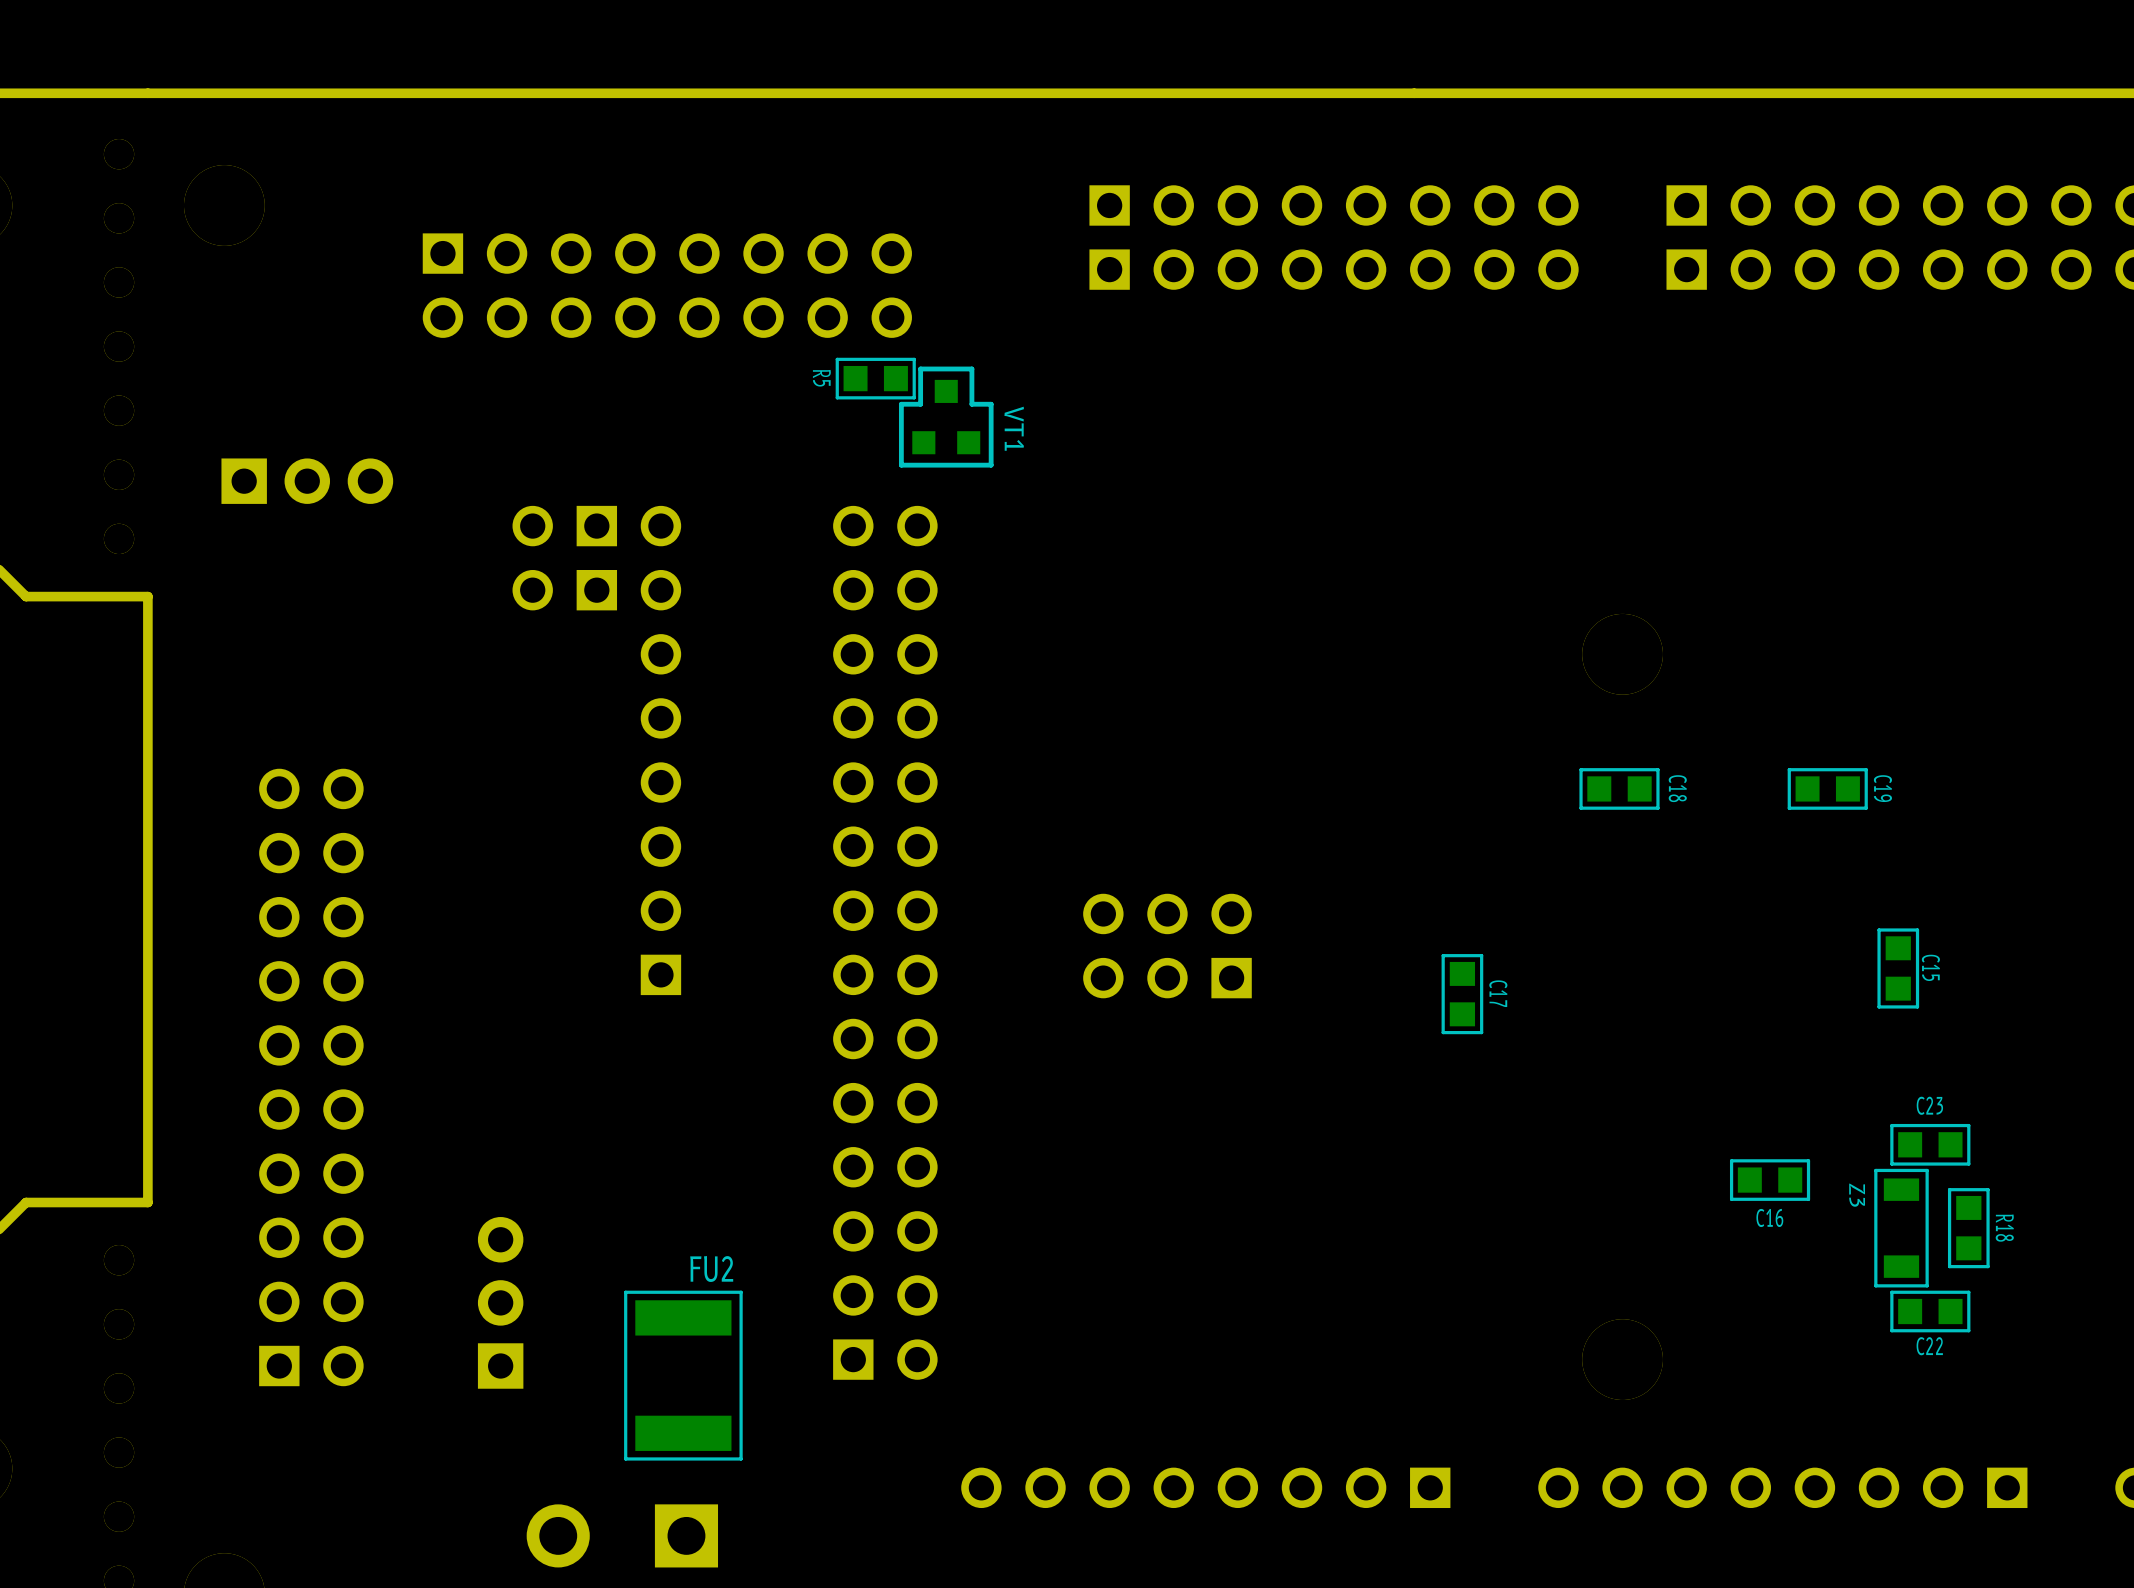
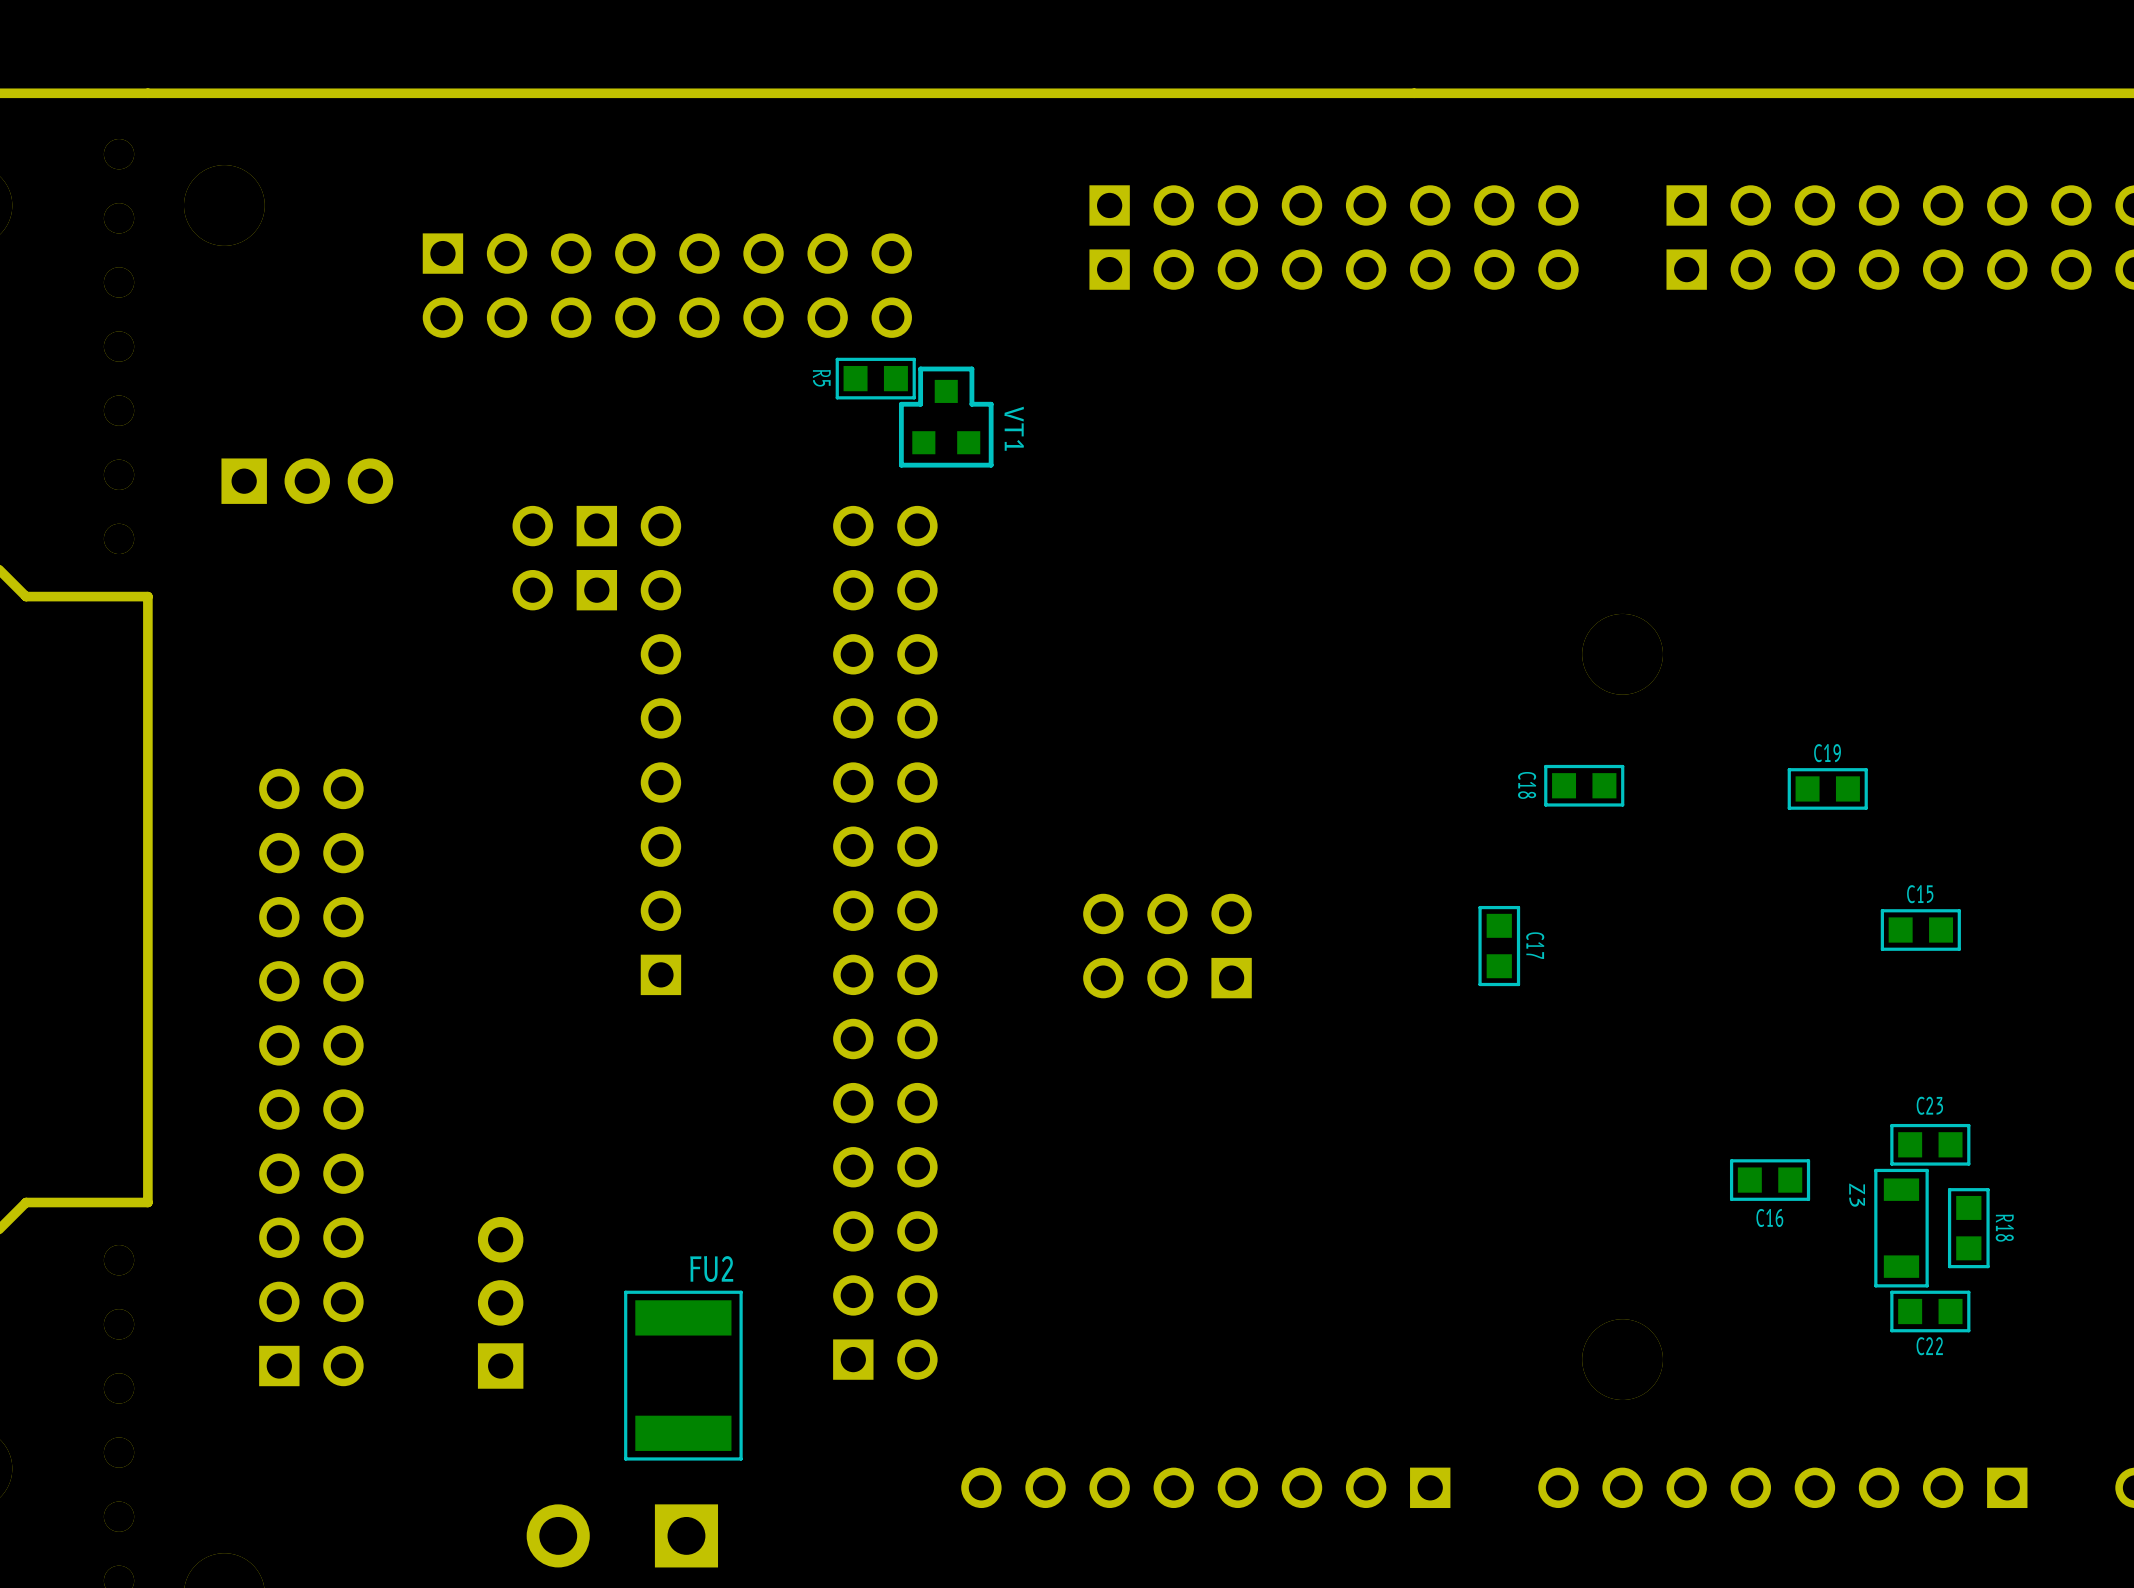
C18 position: (1619, 788) -> (1584, 785)
C18 name position: C18 (1677, 788) -> C18 (1527, 785)
C19 name rotation: 0° (1882, 788) -> 90° counterclockwise (1827, 753)
C19 name position: C19 (1882, 788) -> C19 (1827, 753)
C15 rotation: 0° (1898, 968) -> 90° clockwise (1920, 930)
C17 position: (1462, 994) -> (1499, 946)

